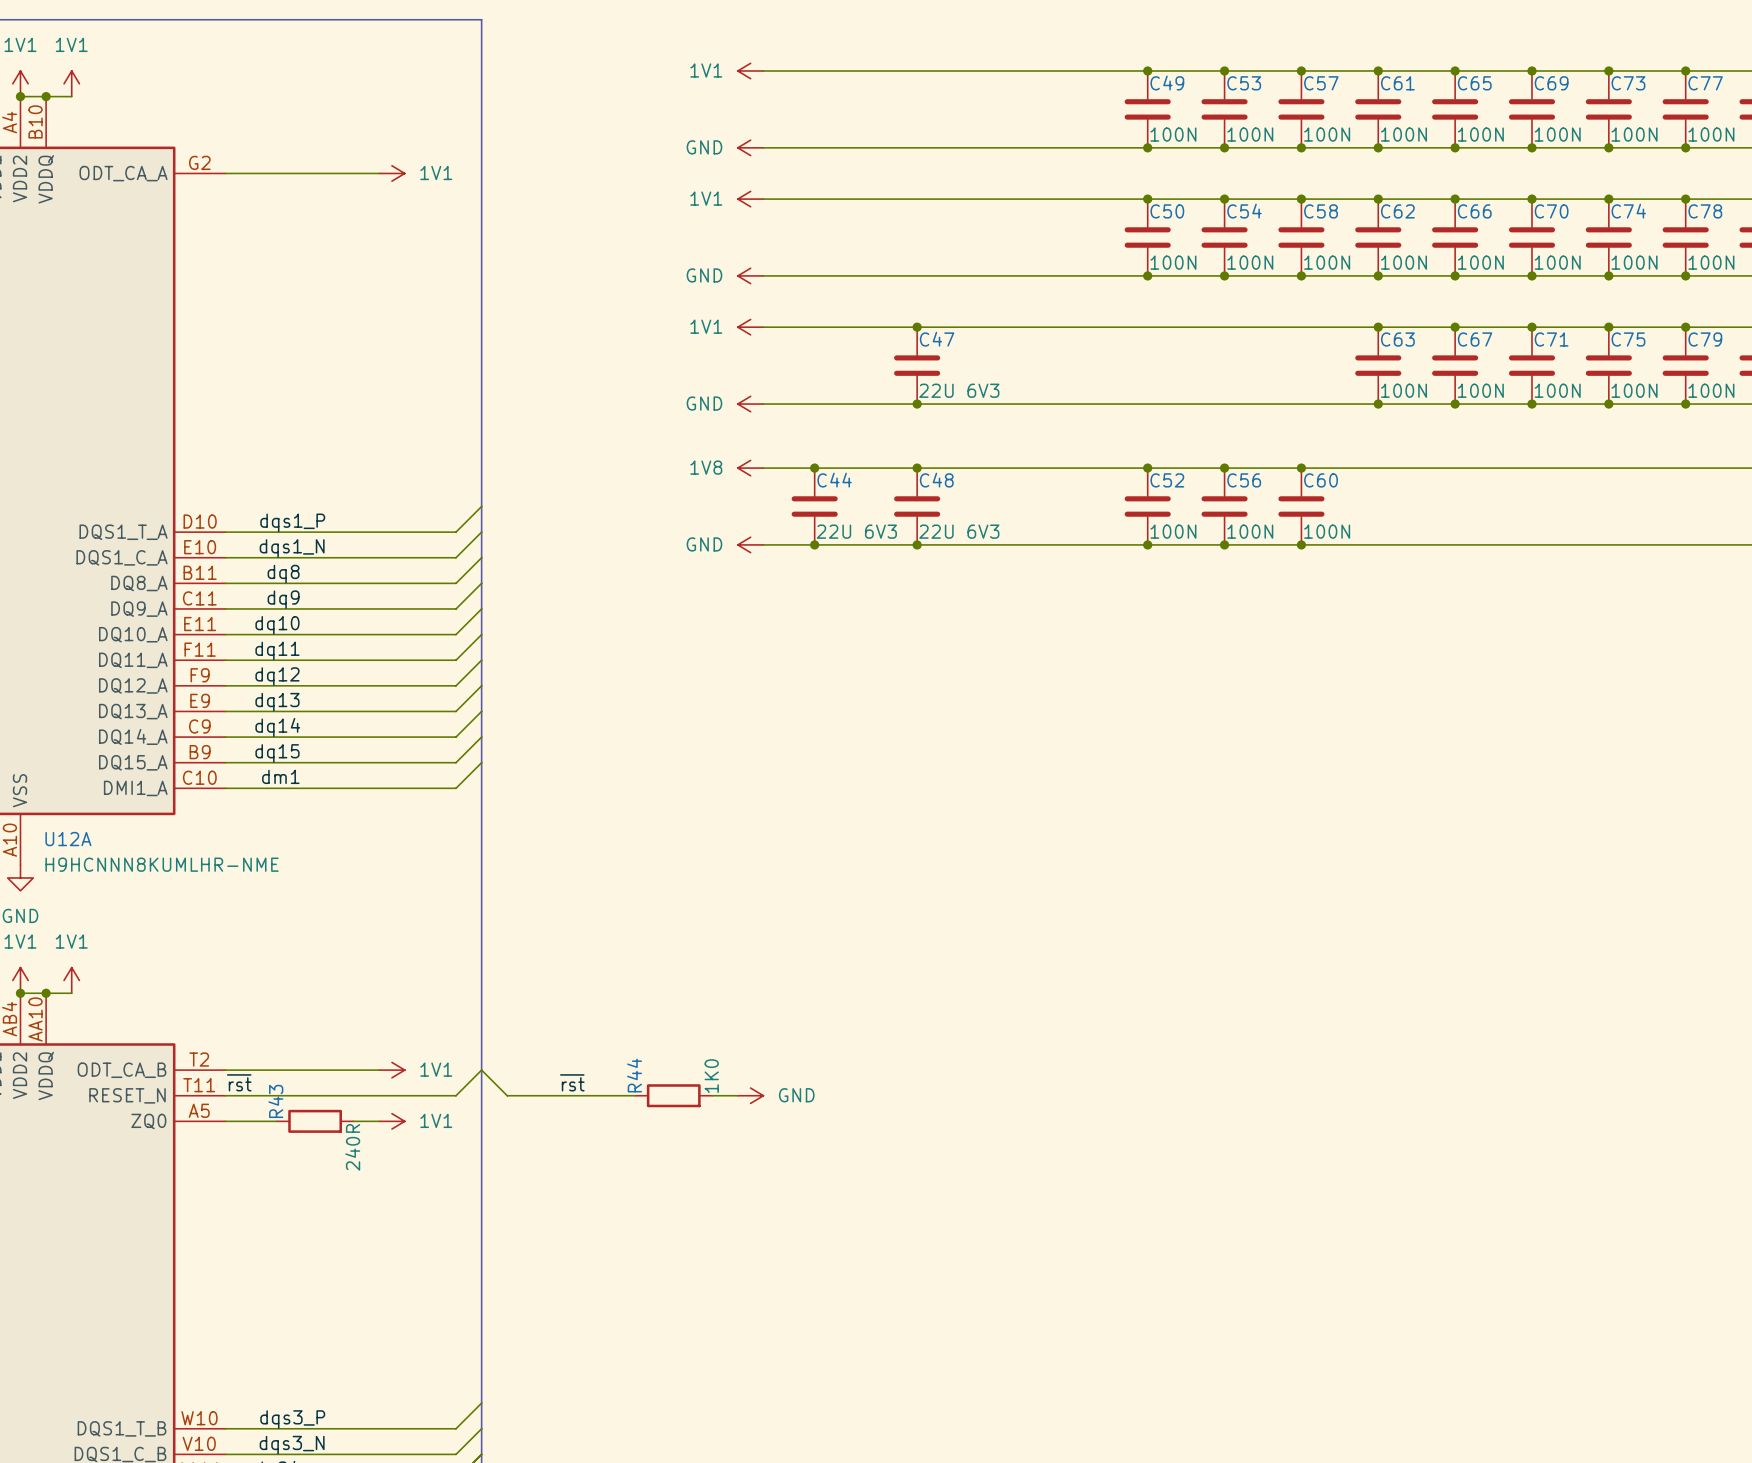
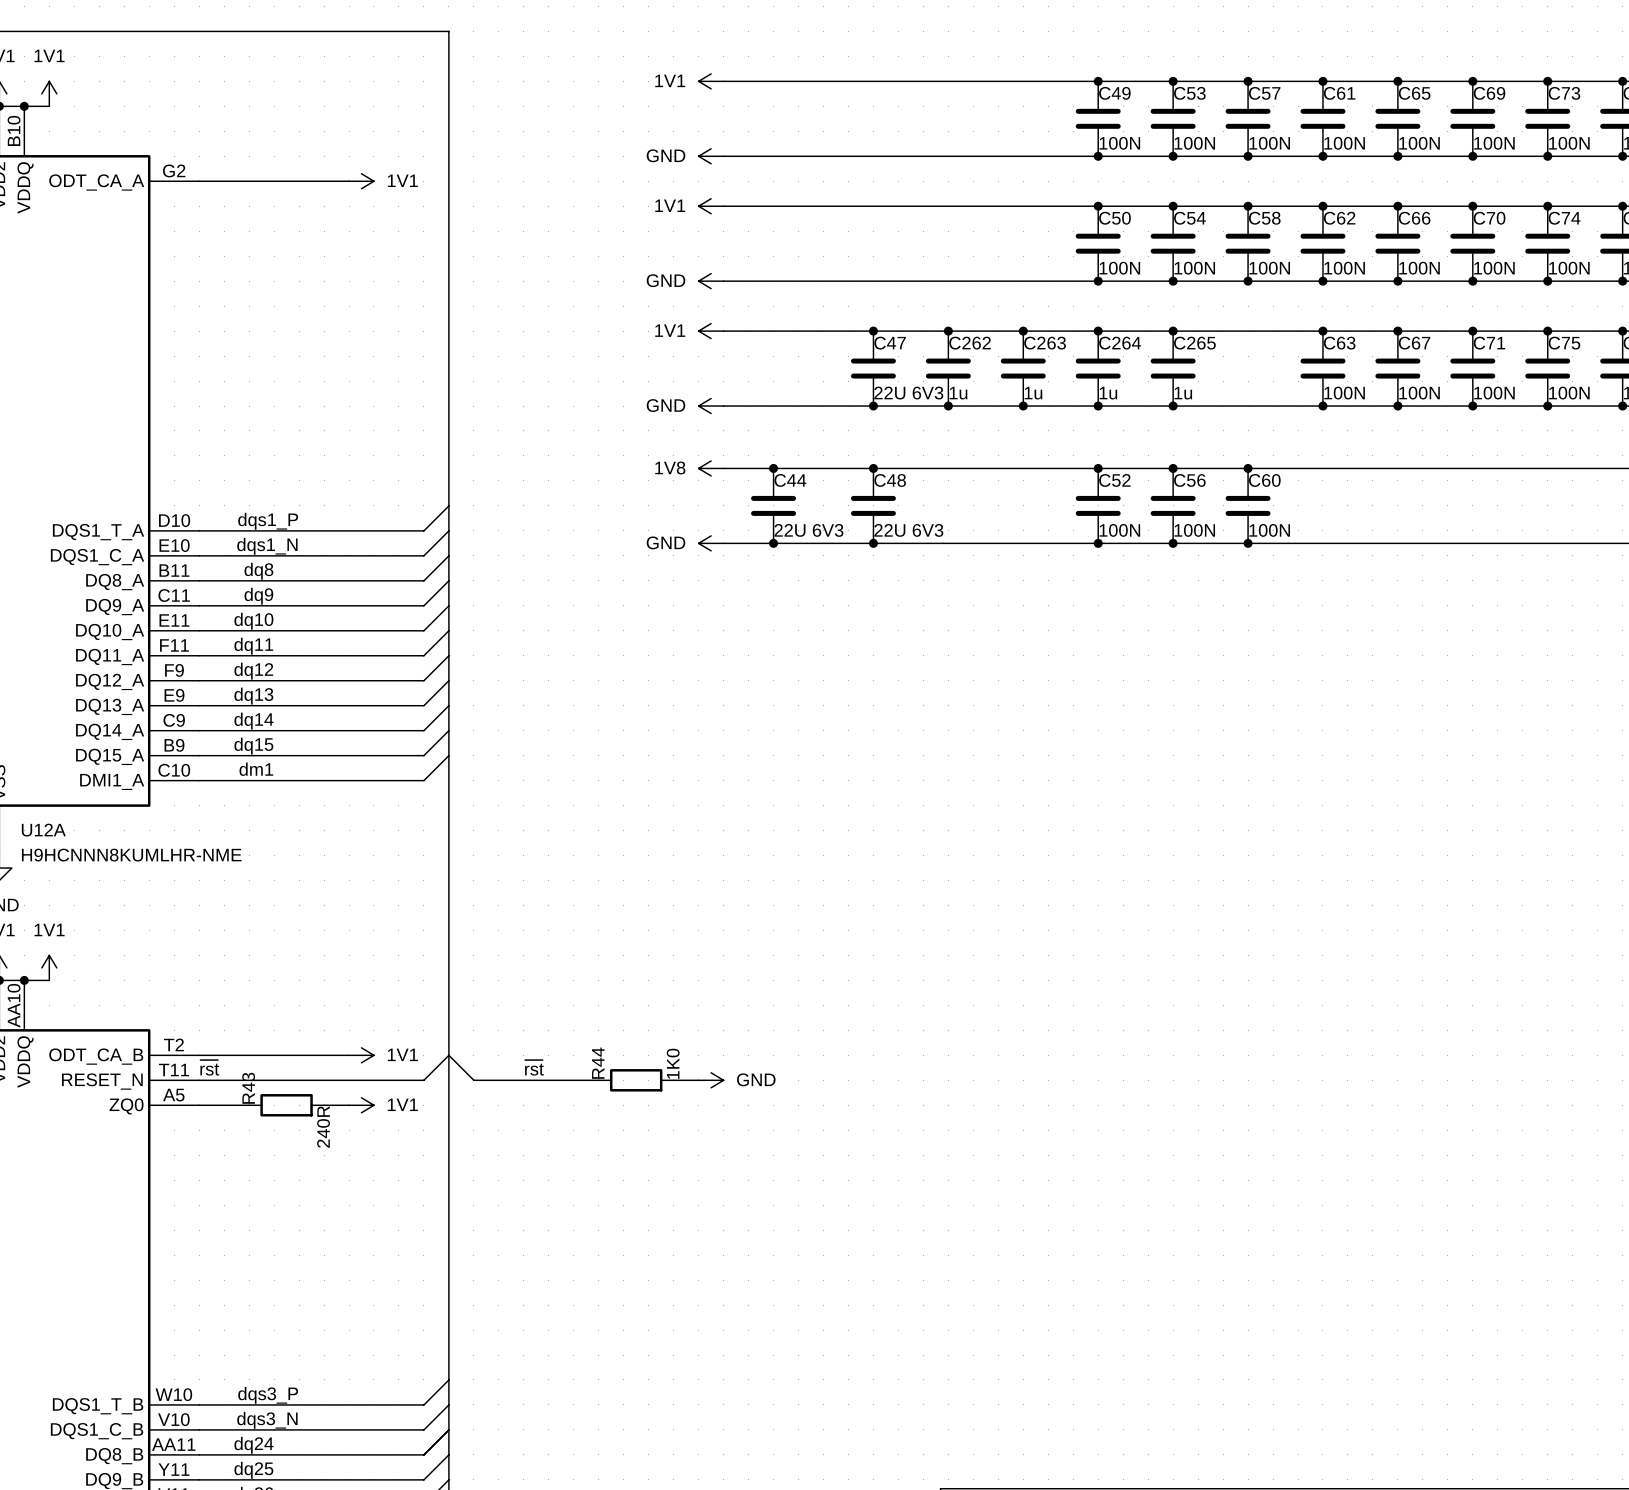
junction: none -> (948, 331)
junction: none -> (1023, 331)
junction: none -> (1098, 331)
junction: none -> (1173, 331)
C262: none -> 1u (948, 368)
C263: none -> 1u (1023, 368)
C264: none -> 1u (1098, 368)
C265: none -> 1u (1173, 368)
junction: none -> (948, 406)
junction: none -> (1023, 406)
junction: none -> (1098, 406)
junction: none -> (1173, 406)

